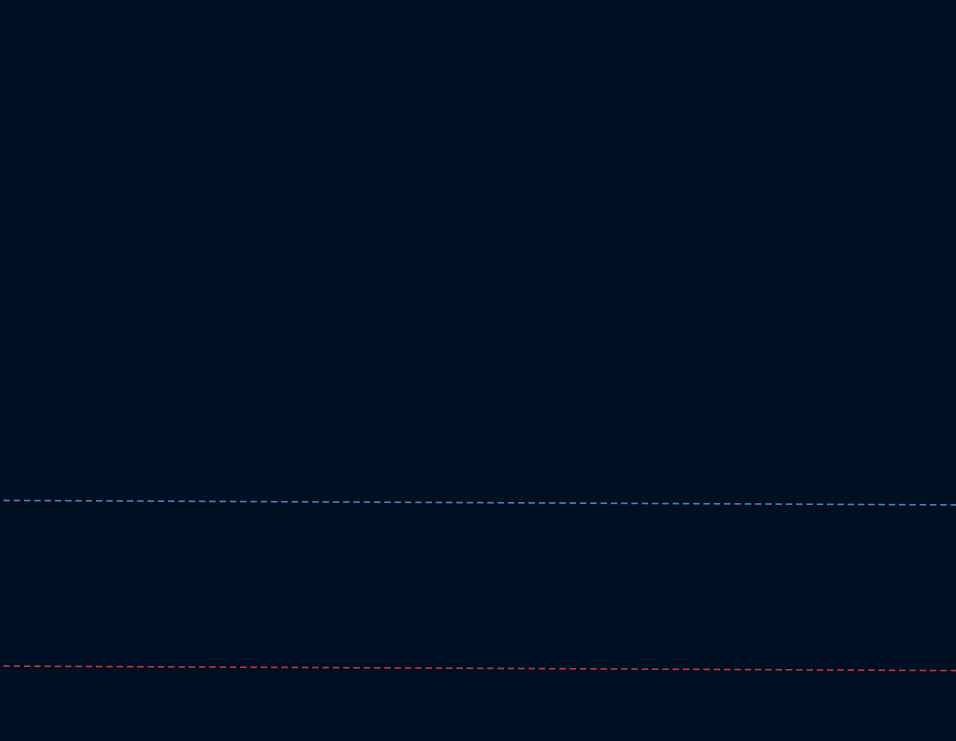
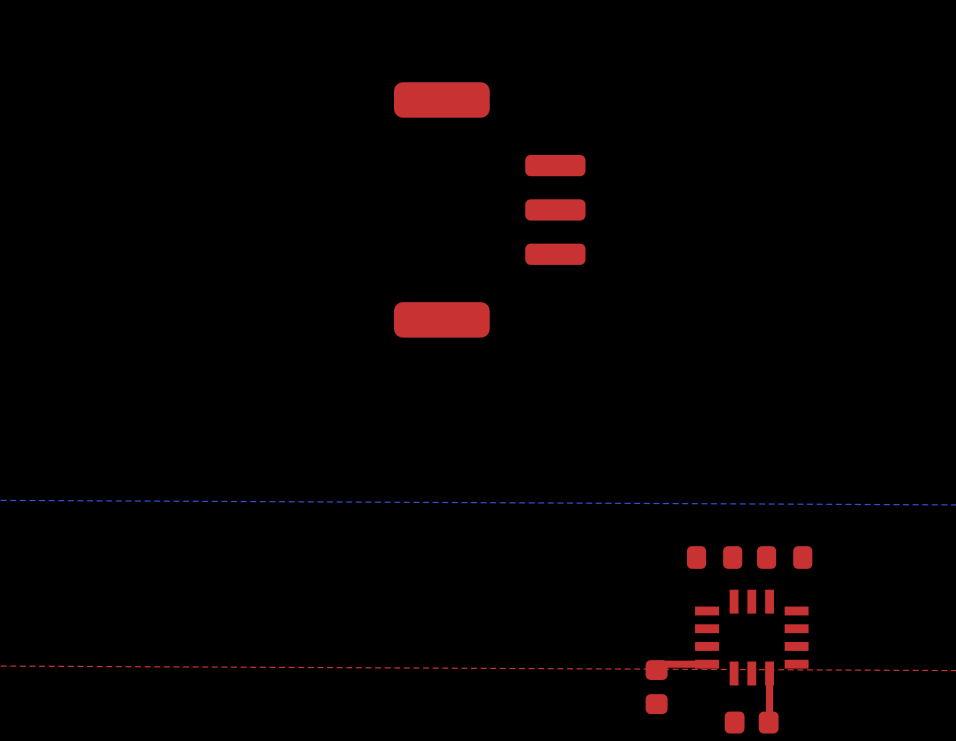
part: none -> (489, 209)
part: none -> (714, 557)
part: none -> (784, 557)
part: none -> (751, 637)
top track: none -> (707, 664) (662, 664) (656, 670)
top track: none -> (769, 673) (768, 722)
part: none -> (656, 687)
part: none -> (751, 722)

